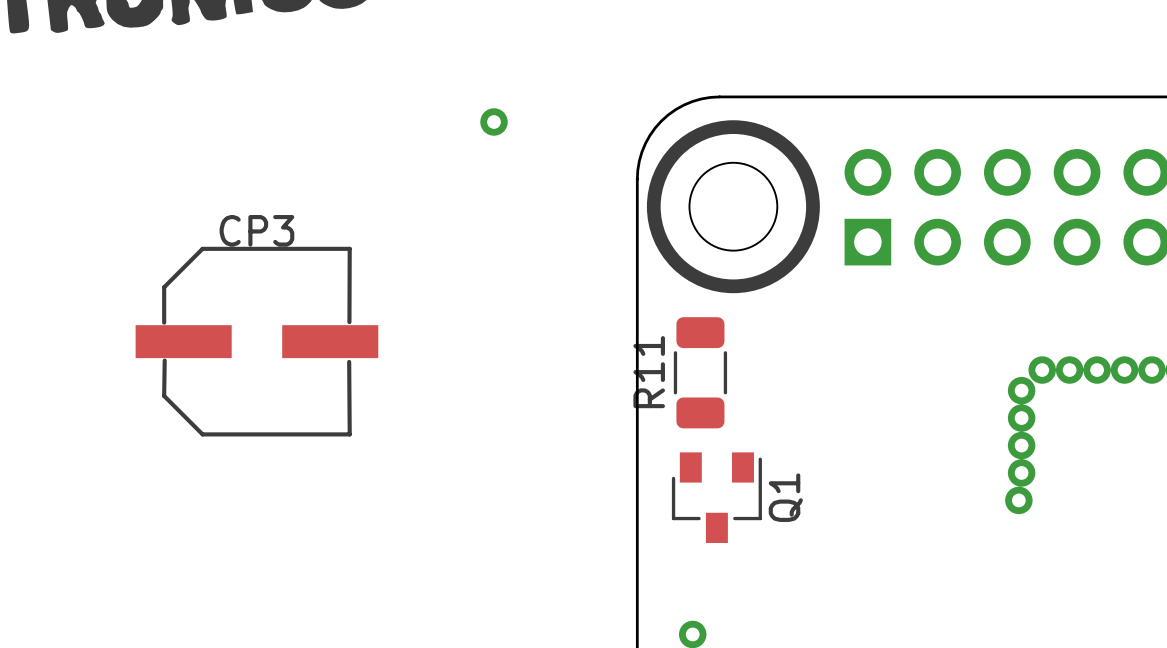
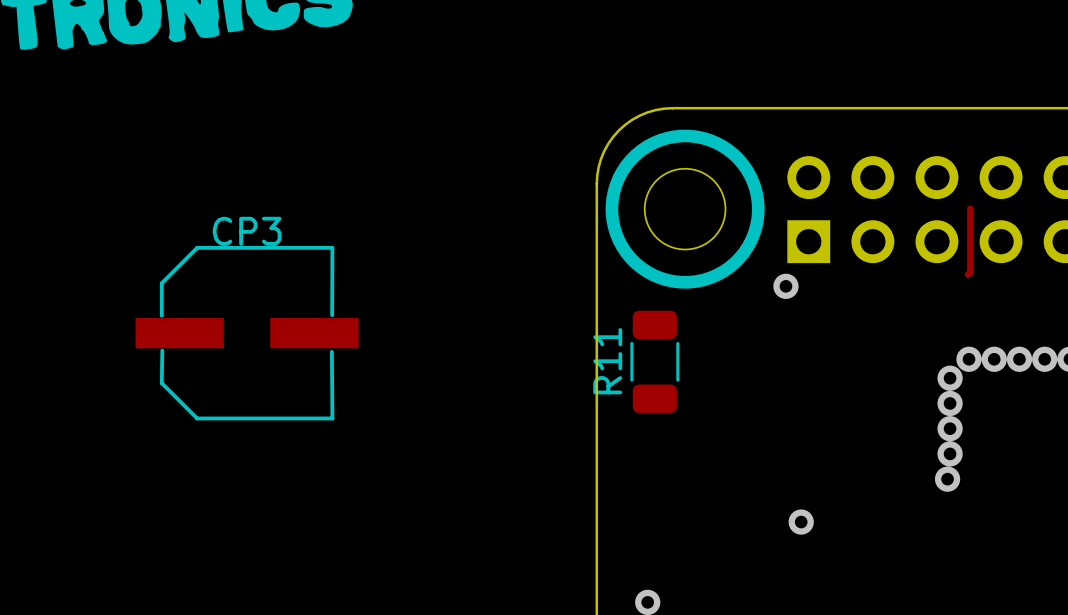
via: (493, 122) -> none
track: none -> (970, 208) (970, 272) (967, 274)
via: none -> (785, 286)
Q1: (716, 497) -> none
via: none -> (801, 522)

